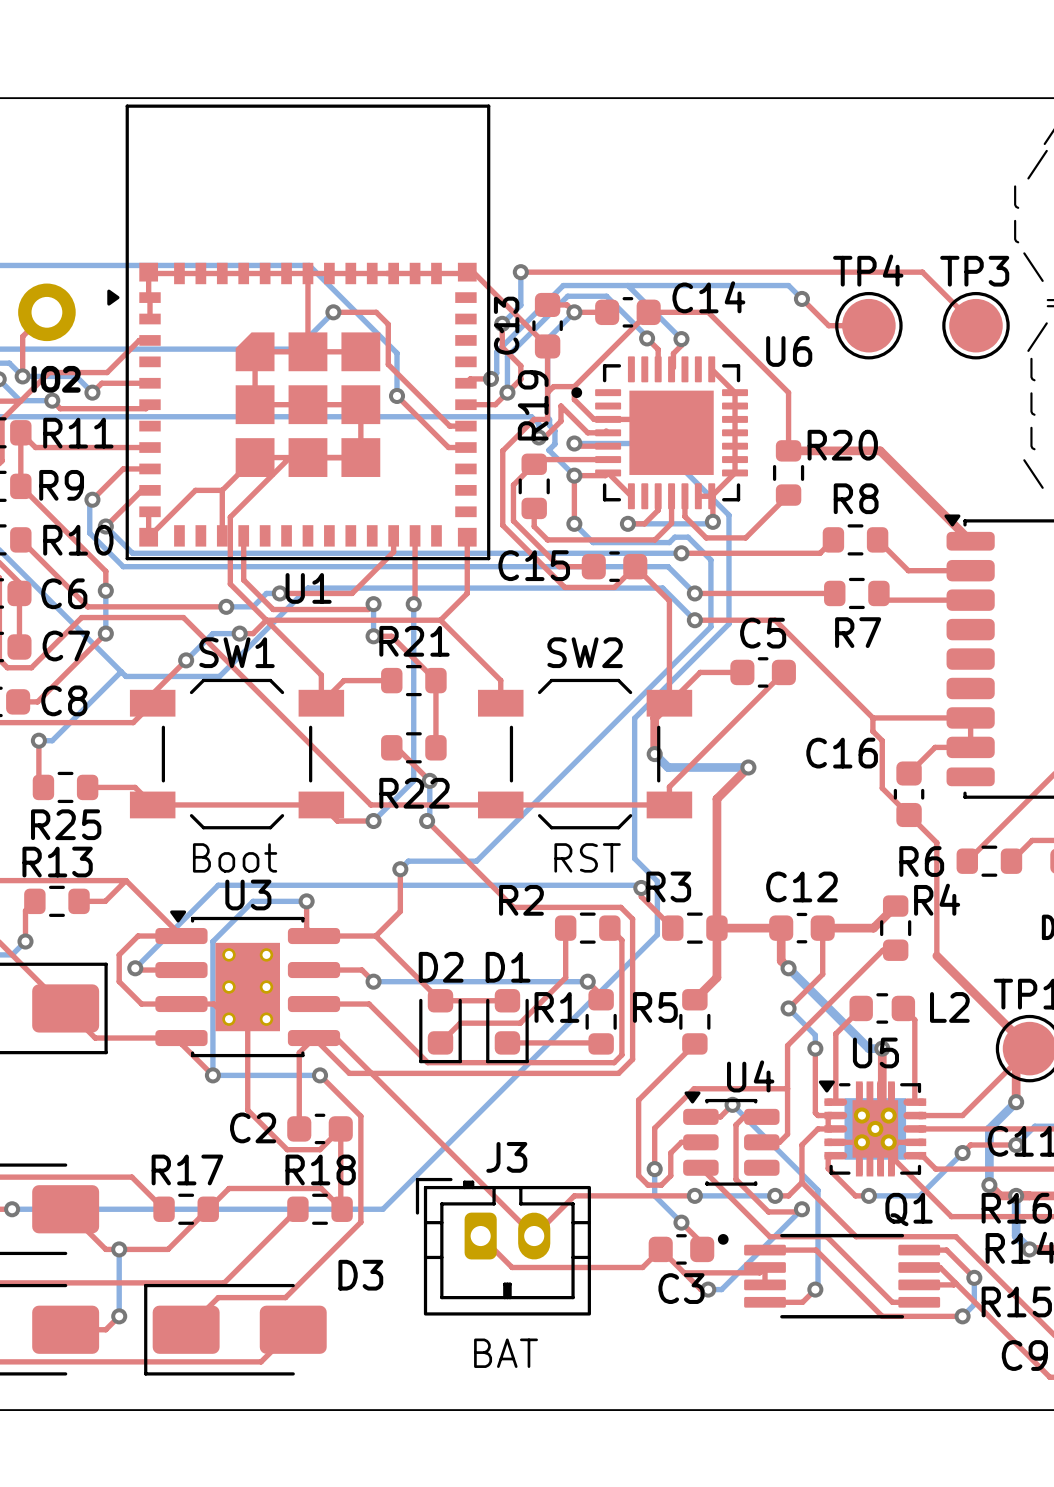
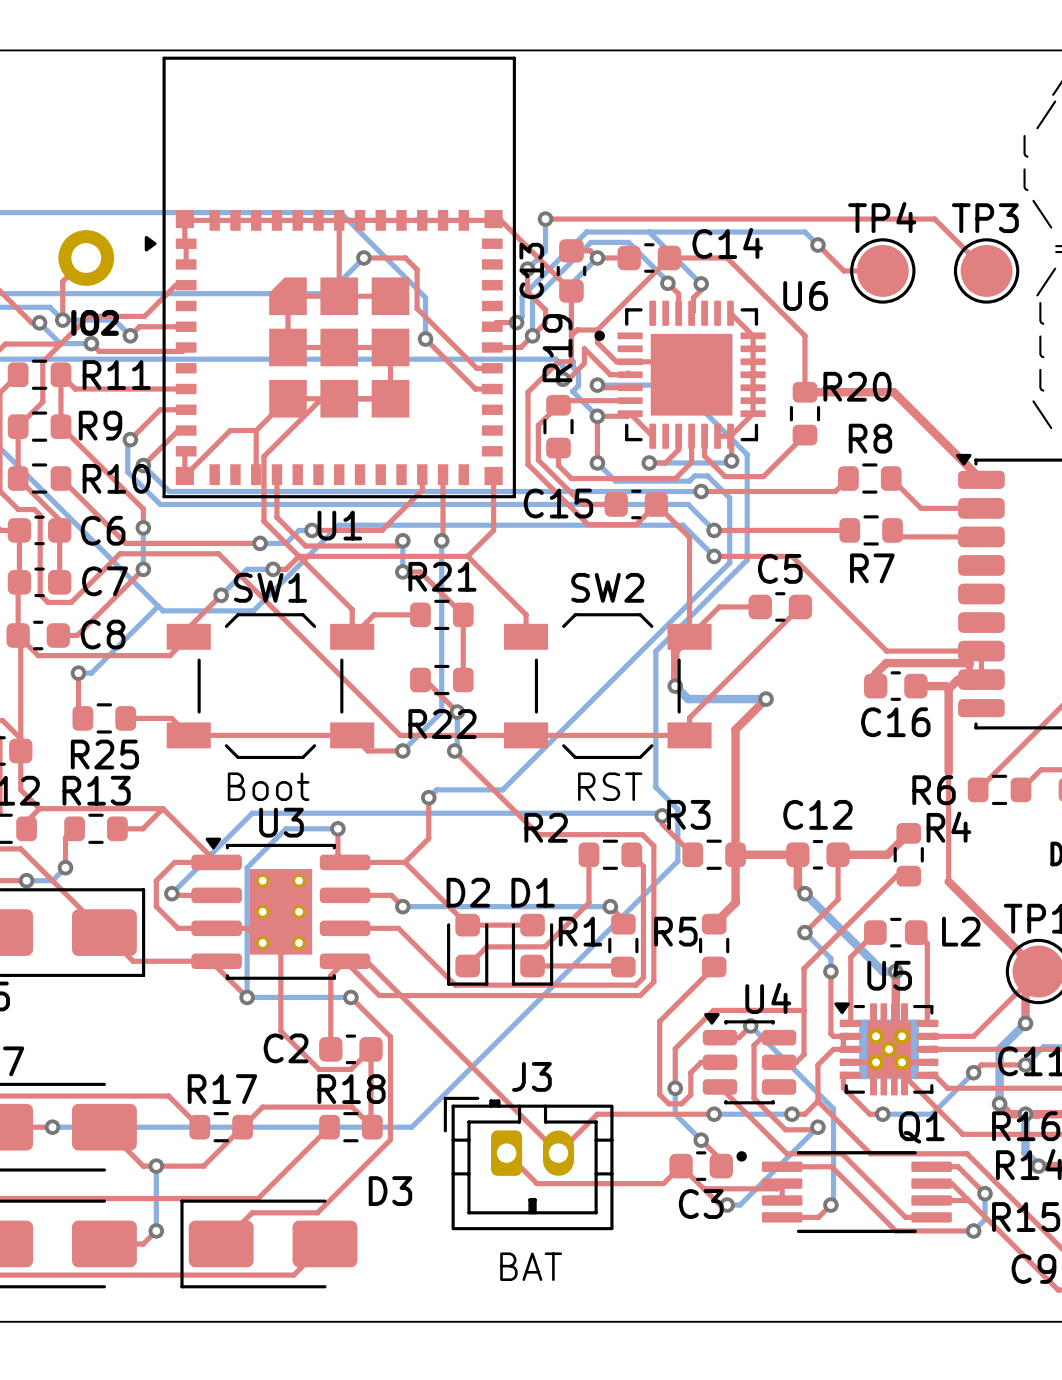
top track: (872, 717) (872, 731) (882, 740) (882, 788) (936, 842) -> (948, 689) (948, 772)
top track: none -> (969, 665) (969, 663) (886, 663) (875, 673) (875, 686)
top track: (946, 747) (935, 747) (909, 773) -> (958, 679) (948, 689)
C16 name position: C16 (842, 753) -> C16 (895, 722)
top track: none -> (915, 686) (945, 686) (948, 689)
C16 rotation: 0° (909, 794) -> 90° clockwise (895, 686)
C16 position: (909, 794) -> (895, 686)

